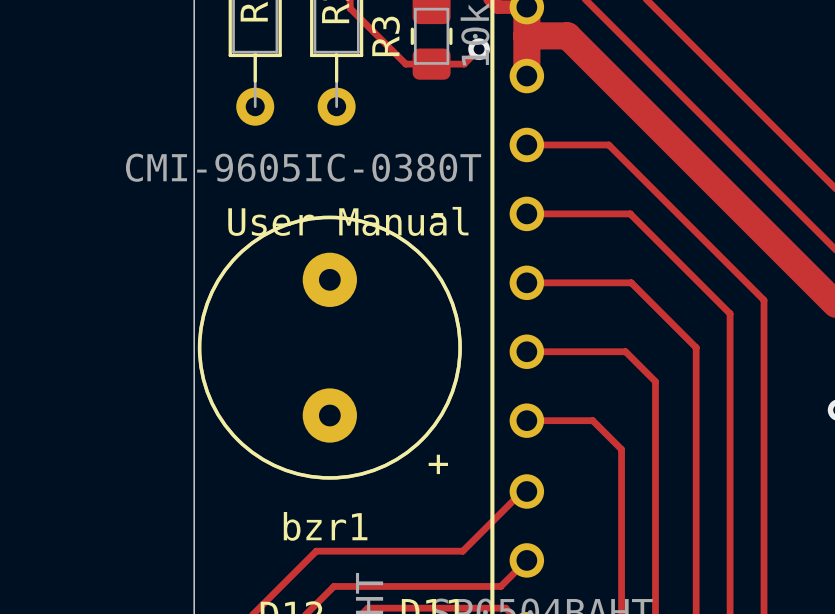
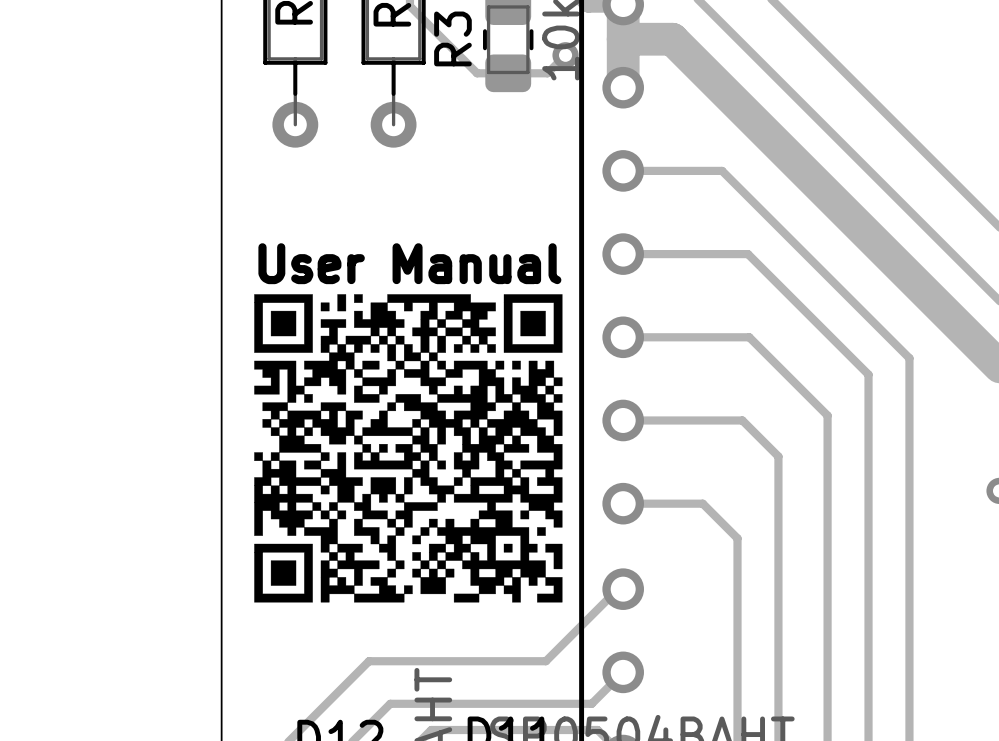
drawing: none -> [254, 294, 563, 603]
bzr1: CMI-9605IC-0380T (329, 347) -> none

